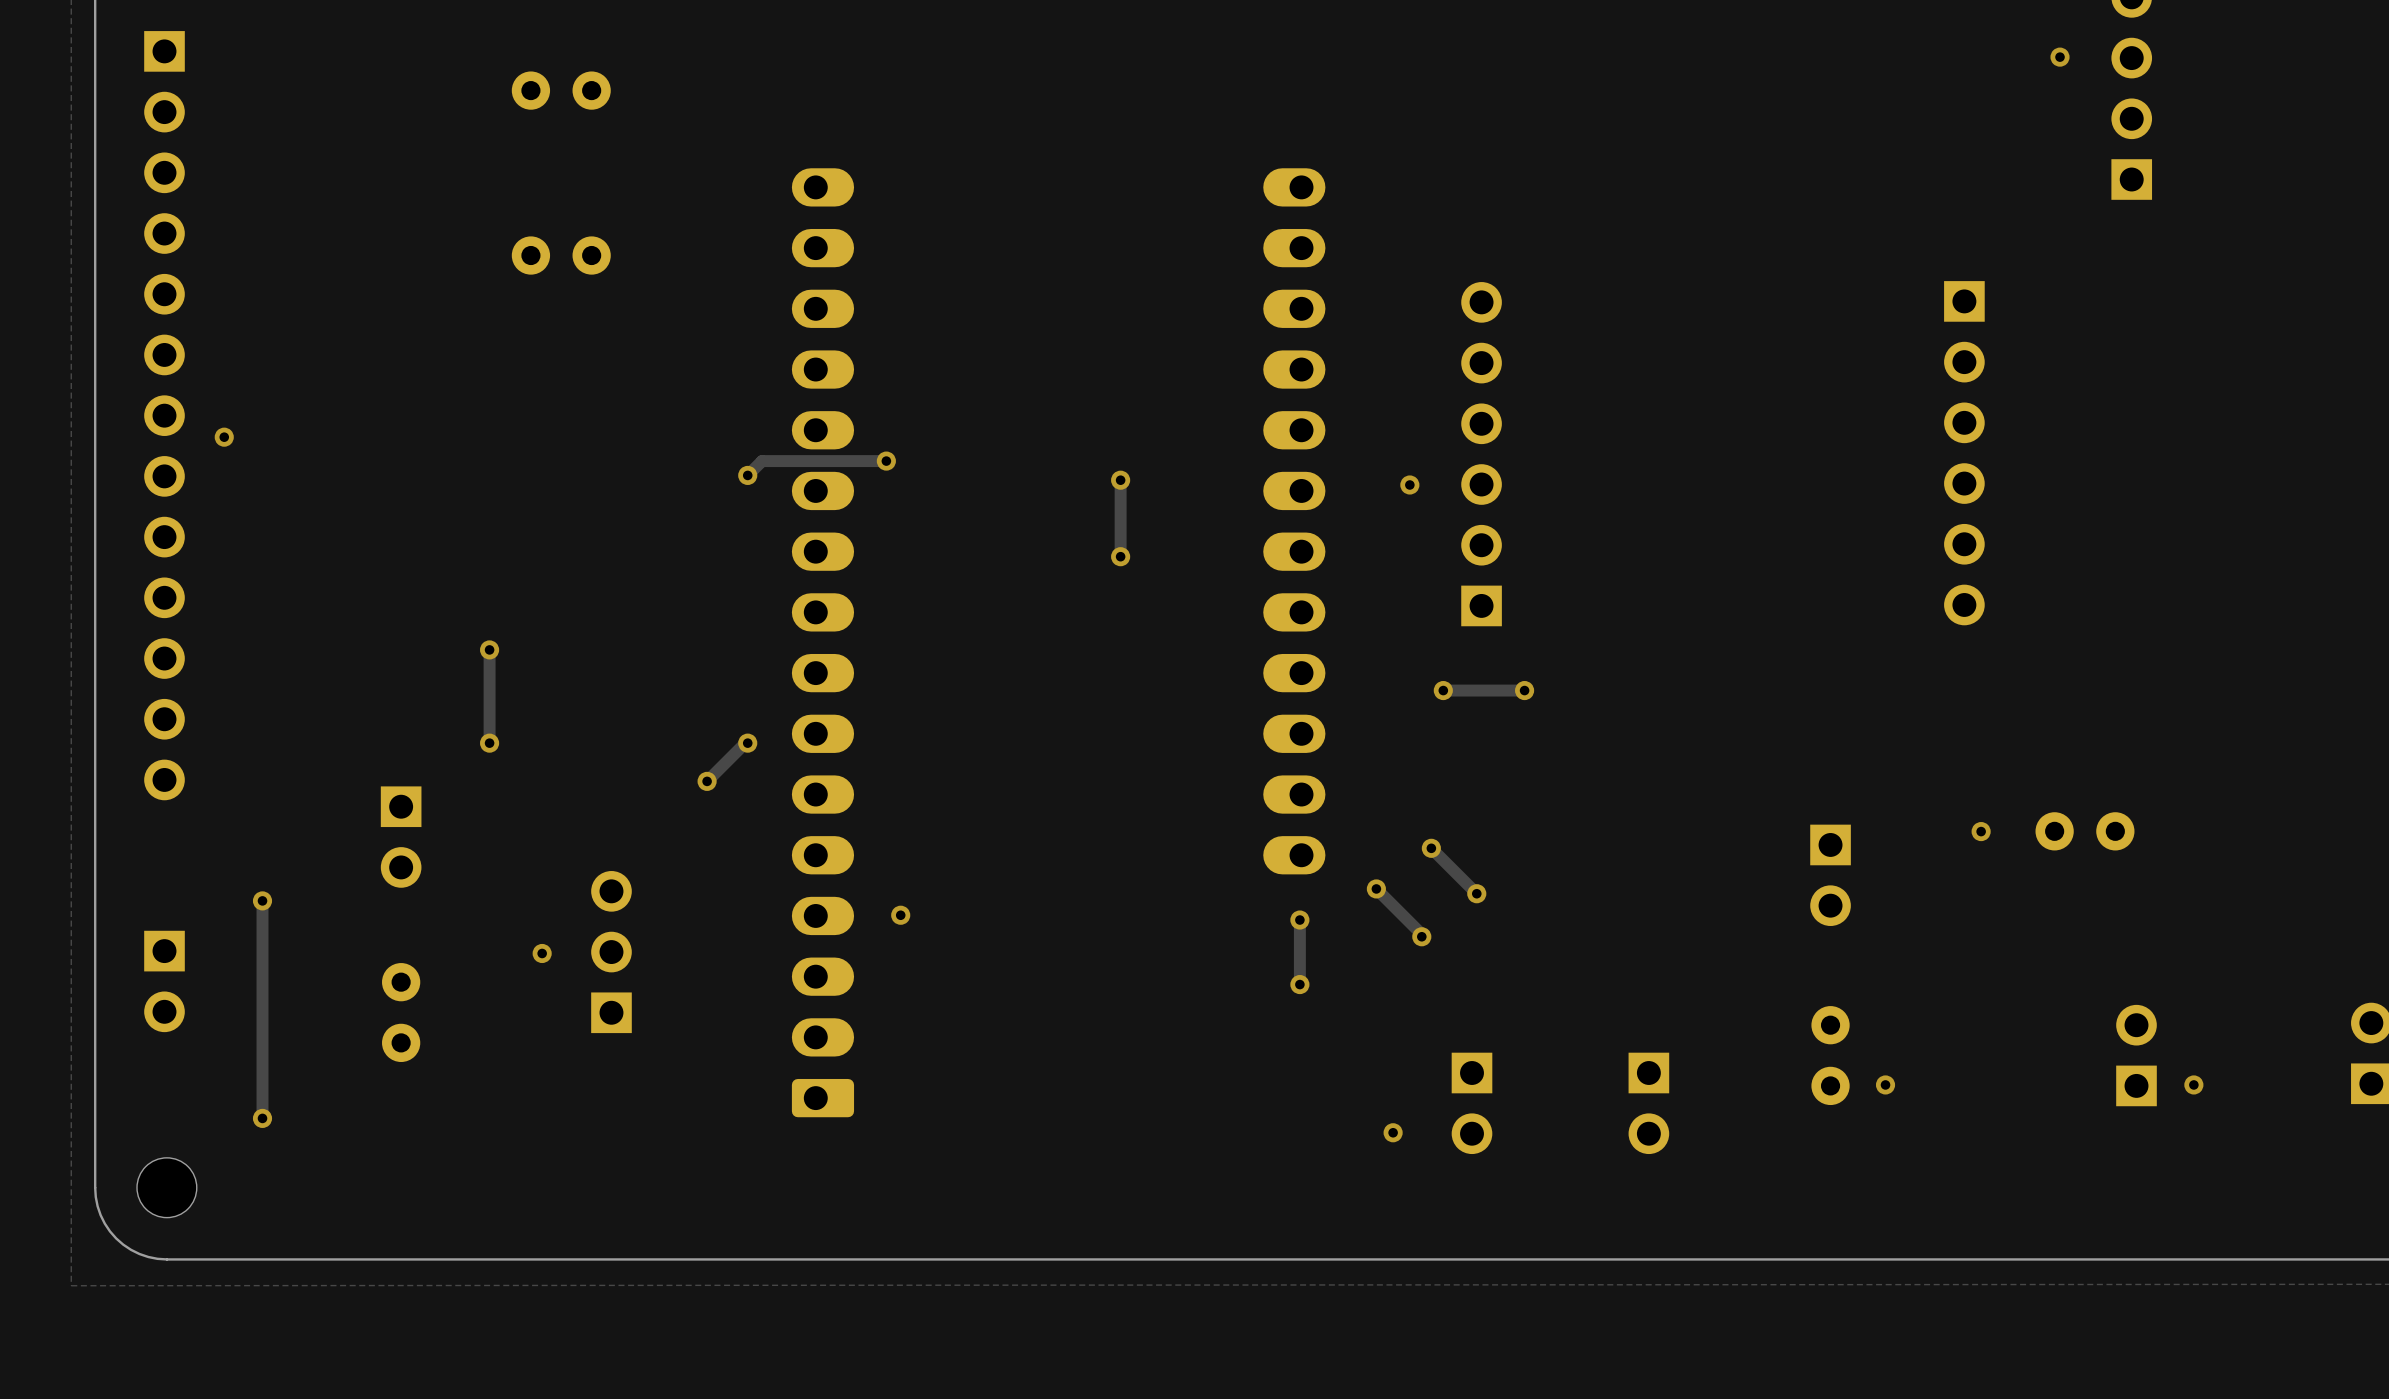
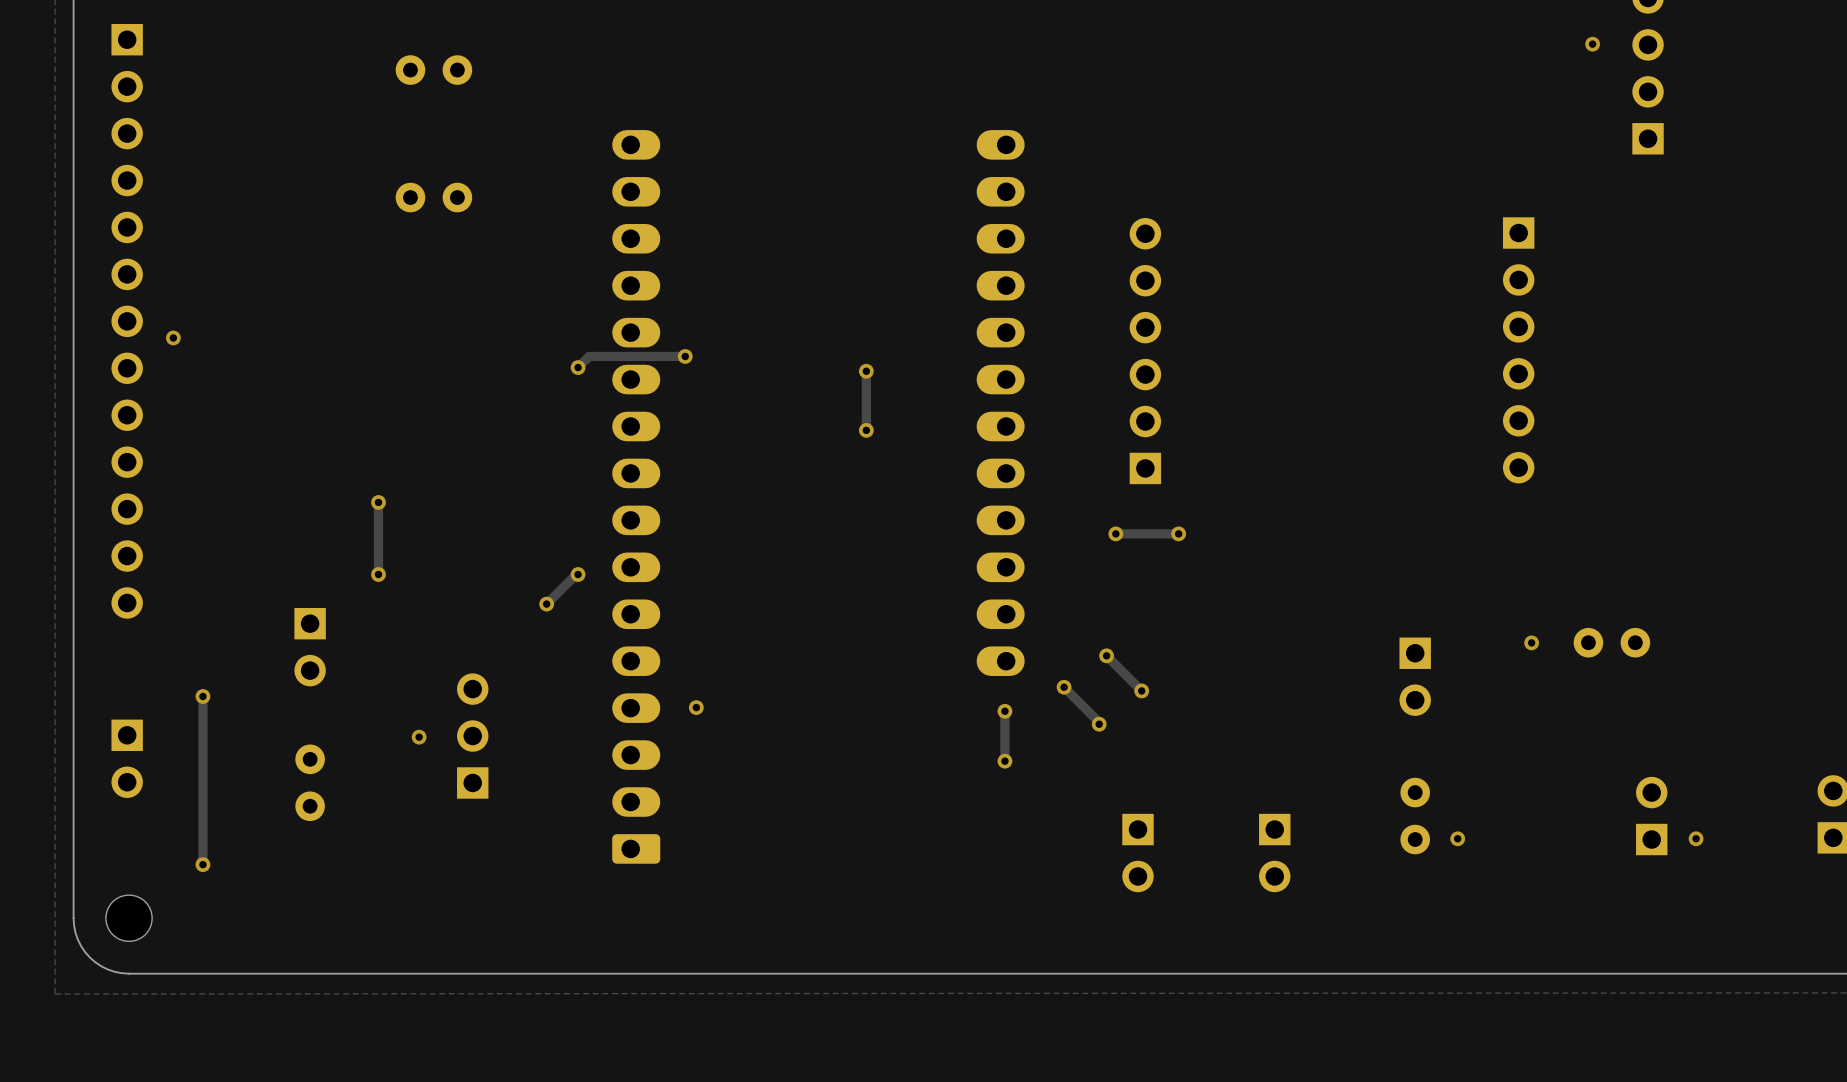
via: (1409, 484) -> none
via: (1393, 1132) -> none

